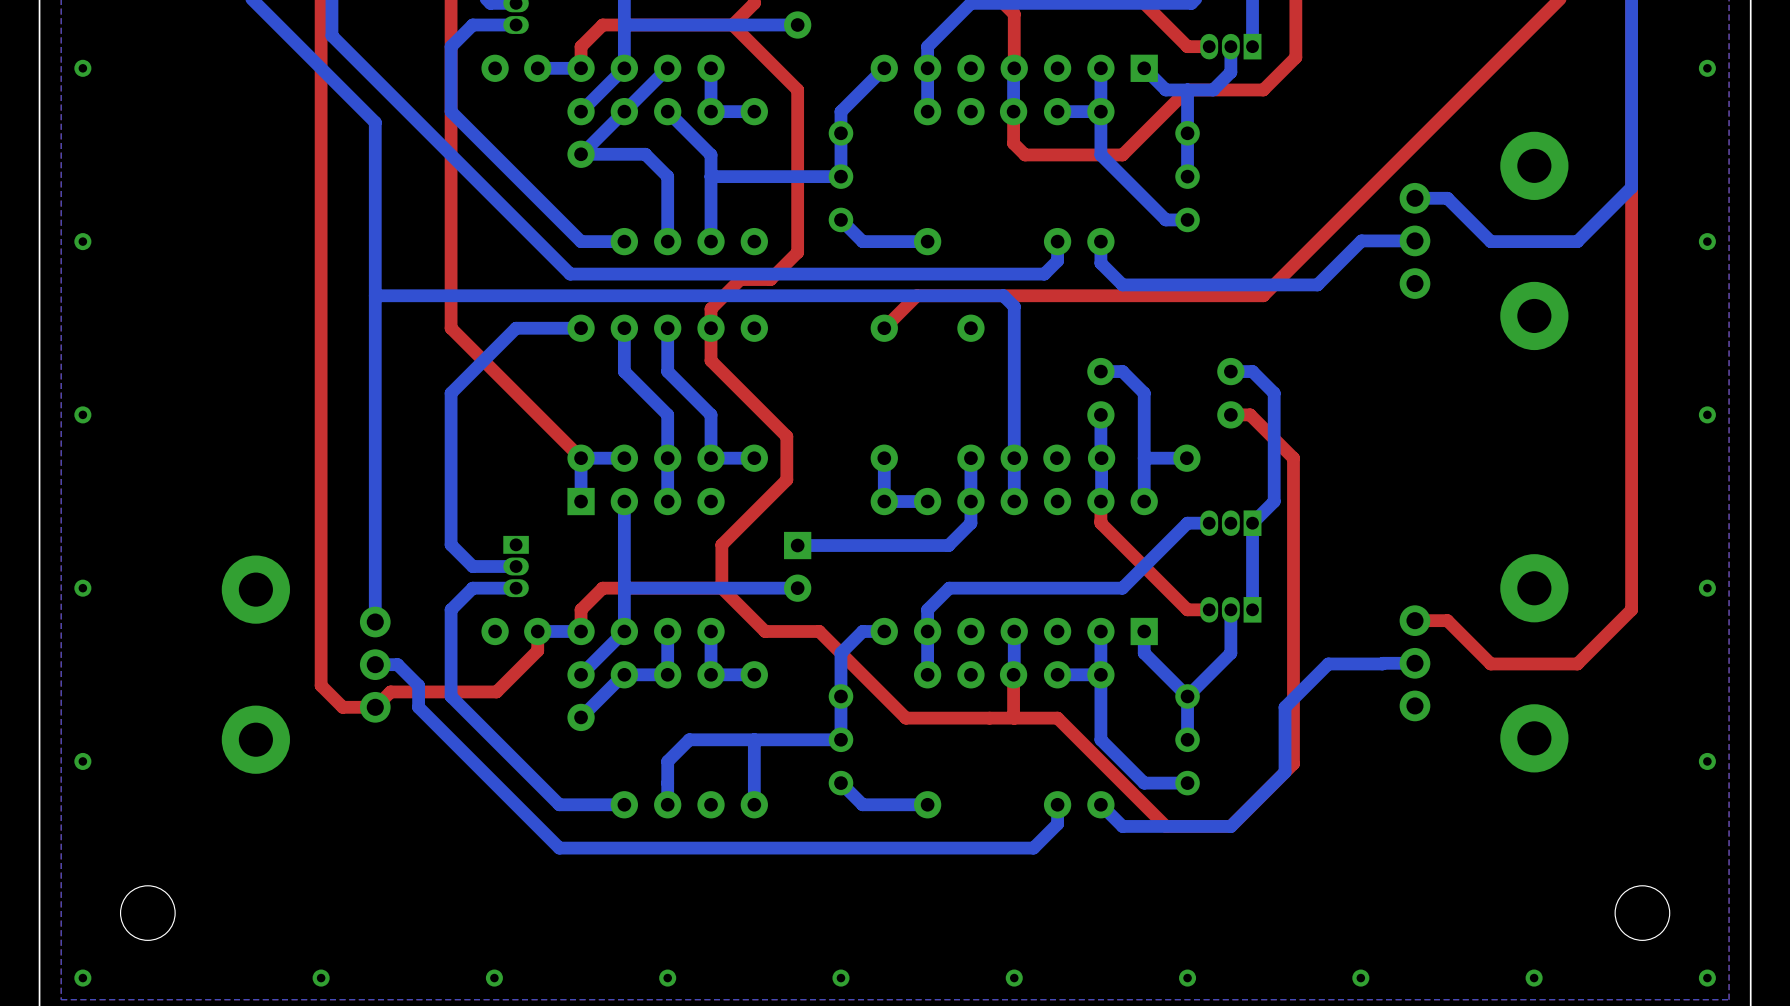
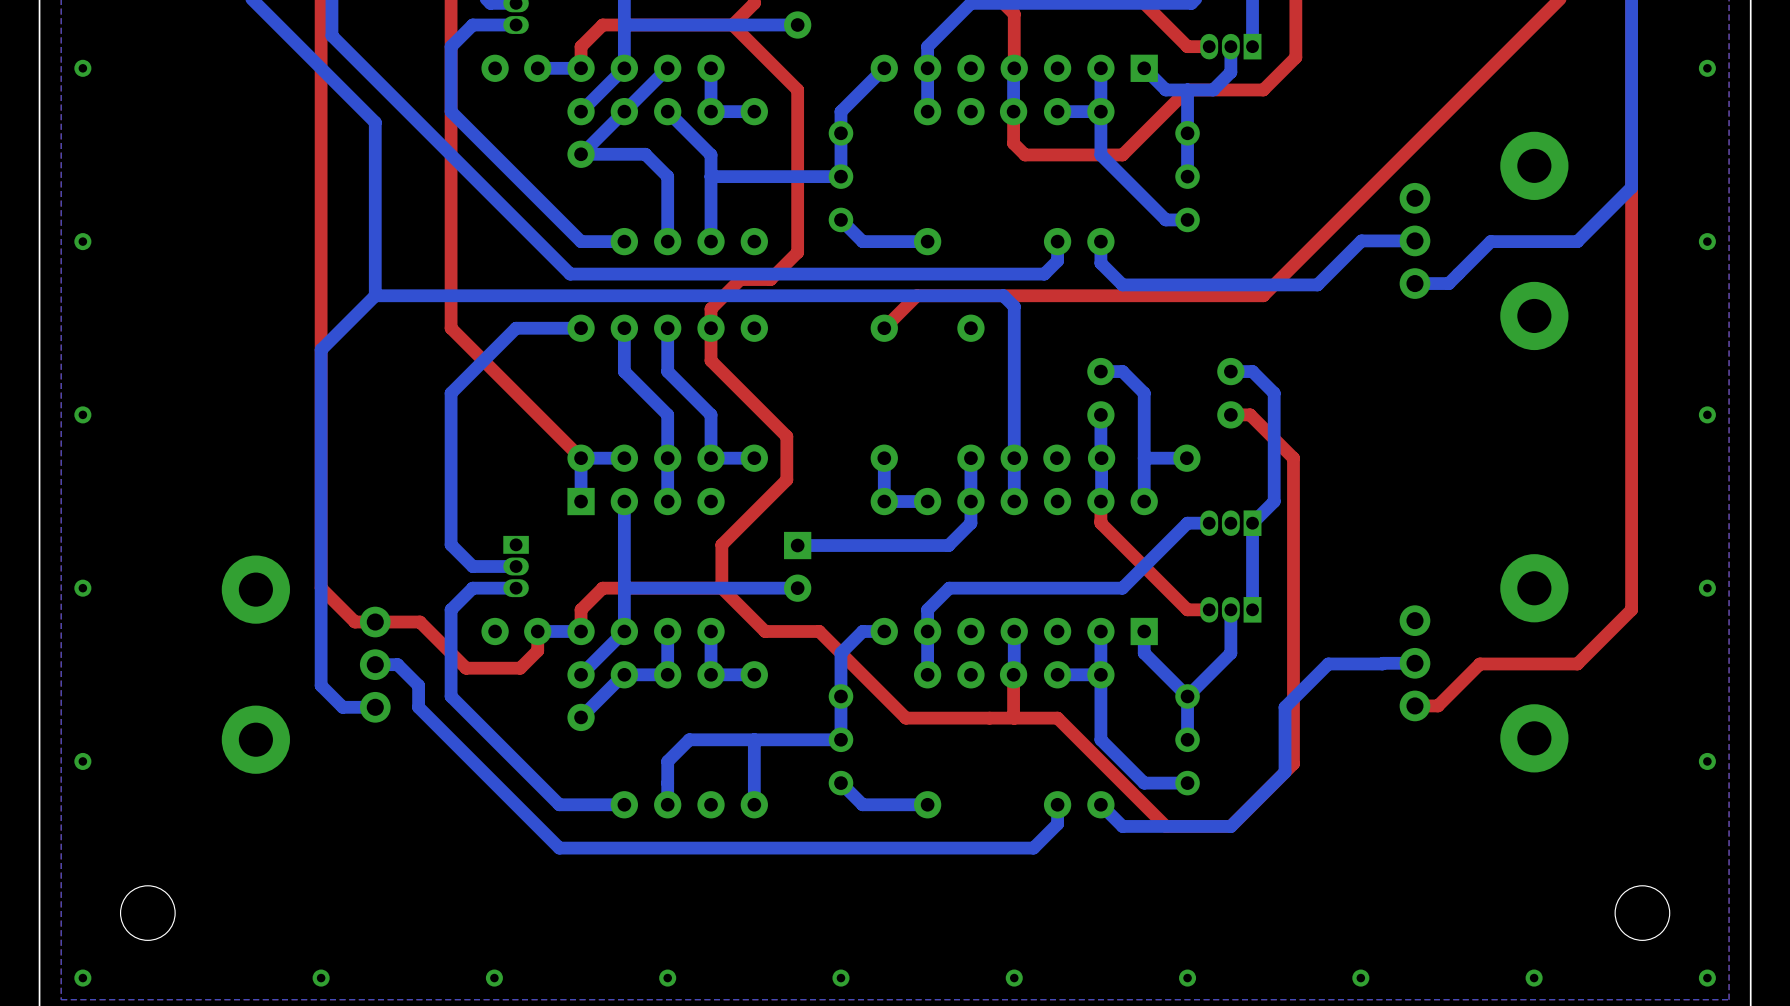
bottom track: (1414, 198) (1447, 198) (1490, 241) -> (1414, 283) (1448, 283) (1490, 241)
bottom track: (375, 295) (375, 622) -> (375, 295) (321, 349) (321, 685) (342, 707) (375, 707)
top track: (321, 588) (321, 685) (342, 707) (375, 707) (390, 691) (496, 691) (520, 668) -> (321, 588) (354, 622) (419, 622) (466, 668) (520, 668)
top track: (1414, 620) (1447, 620) (1490, 663) -> (1414, 705) (1438, 705) (1479, 663) (1490, 663)

